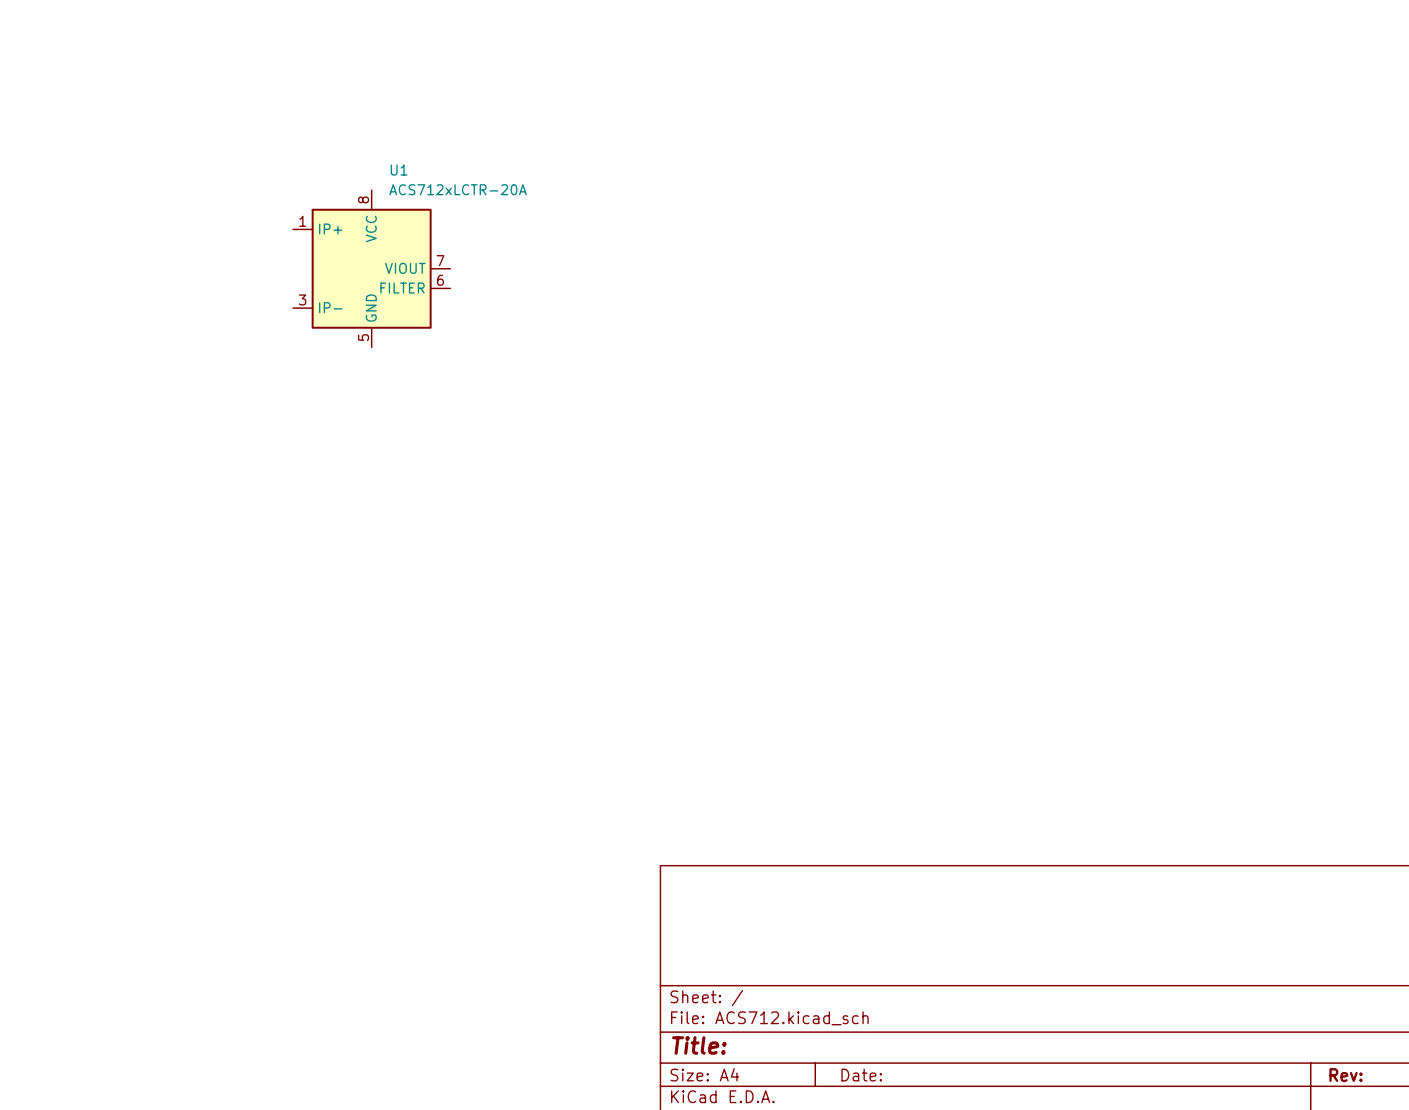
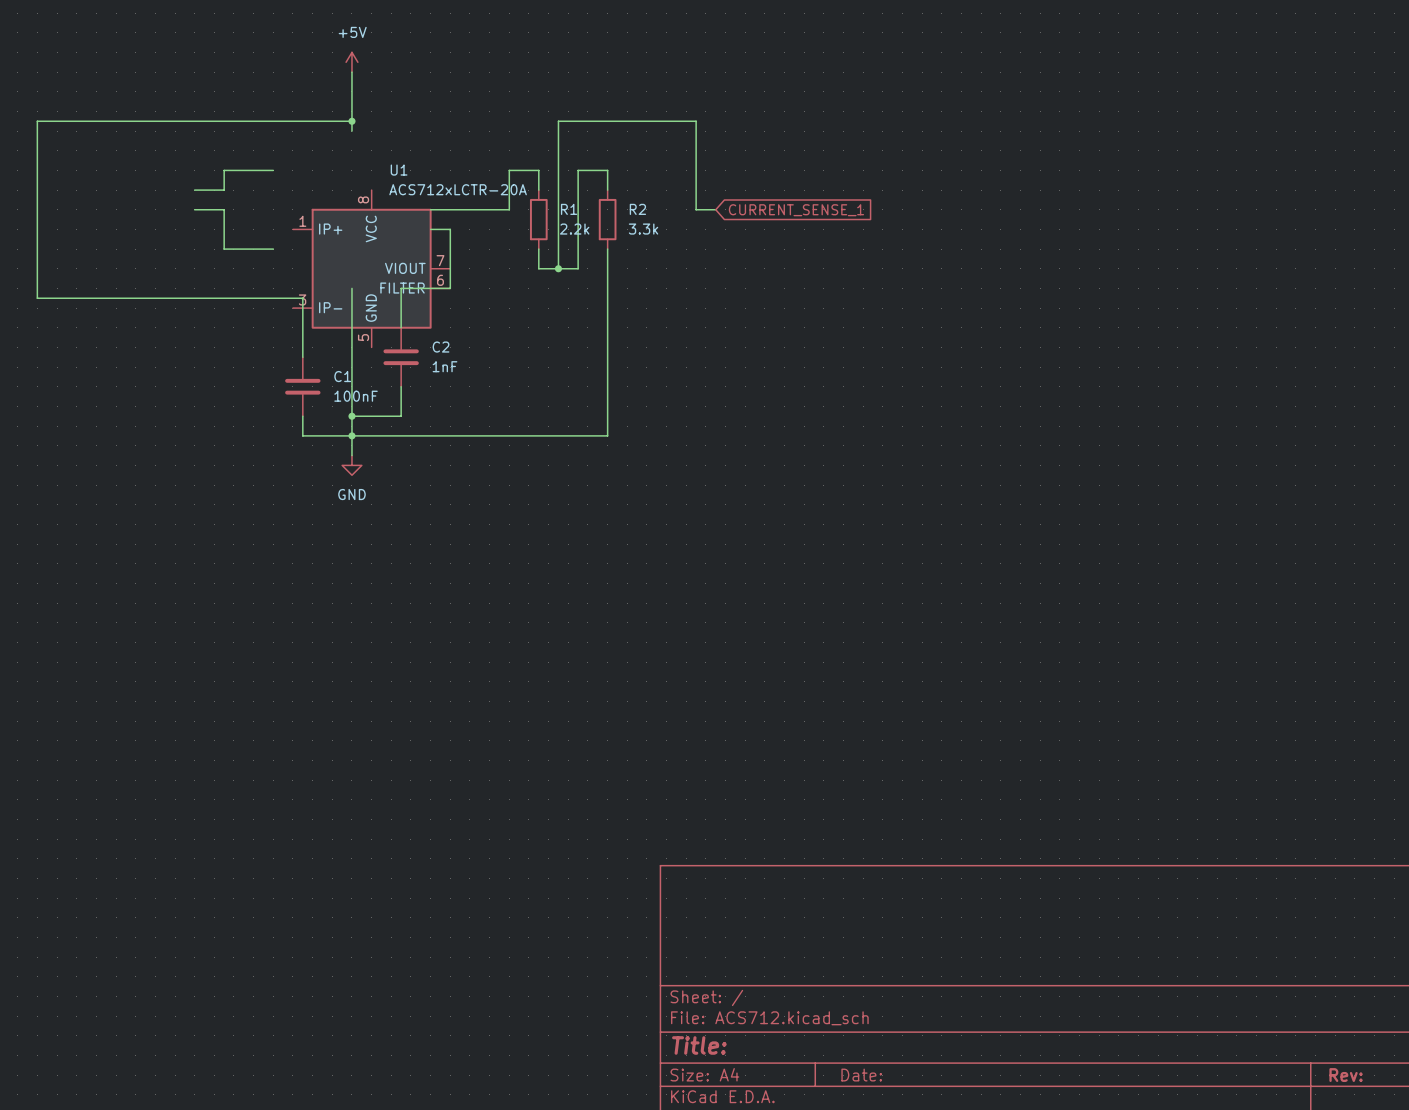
power symbol: none -> +5V (351, 62)
wire: none -> (351, 72) (351, 131)
wire: none -> (351, 121) (37, 121) (37, 298) (302, 298) (302, 357)
junction: none -> (351, 121)
wire: none -> (273, 170) (224, 170) (224, 190) (194, 190)
wire: none -> (538, 190) (538, 170) (509, 170) (509, 209) (430, 209)
wire: none -> (607, 190) (607, 170) (578, 170) (578, 268) (538, 268) (538, 249)
wire: none -> (194, 209) (224, 209) (224, 249) (273, 249)
wire: none -> (715, 209) (696, 209) (696, 121) (558, 121) (558, 268)
global label: none -> CURRENT_SENSE_1 (796, 210)
R1: none -> 2.2k (538, 219)
R2: none -> 3.3k (607, 219)
wire: none -> (430, 229) (450, 229) (450, 288) (401, 288) (401, 327)
wire: none -> (607, 249) (607, 435) (302, 435) (302, 416)
junction: none -> (558, 268)
wire: none -> (351, 288) (351, 455)
C2: none -> 1nF (401, 357)
C1: none -> 100nF (302, 386)
wire: none -> (401, 386) (401, 416) (351, 416)
junction: none -> (351, 416)
junction: none -> (351, 435)
power symbol: none -> GND (351, 465)

